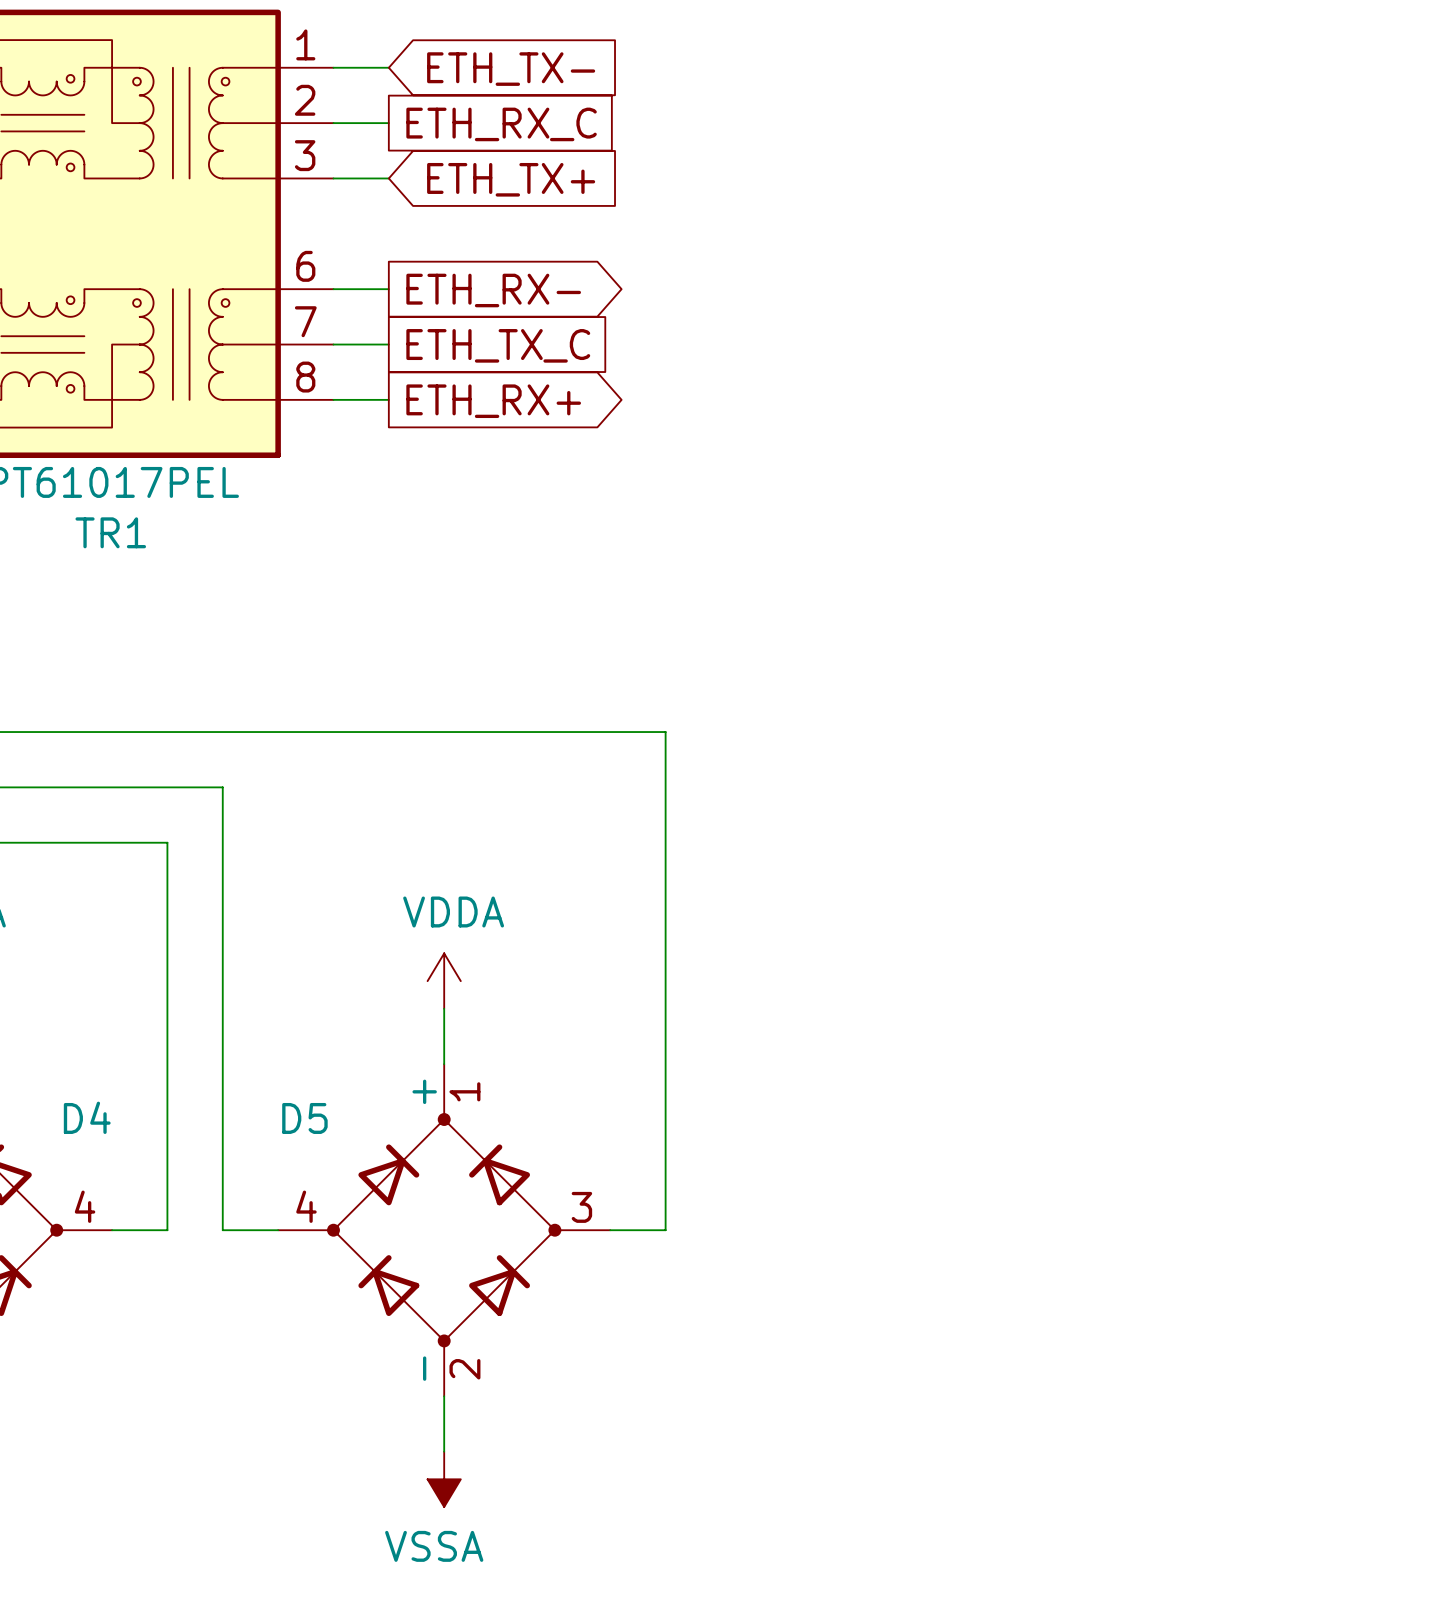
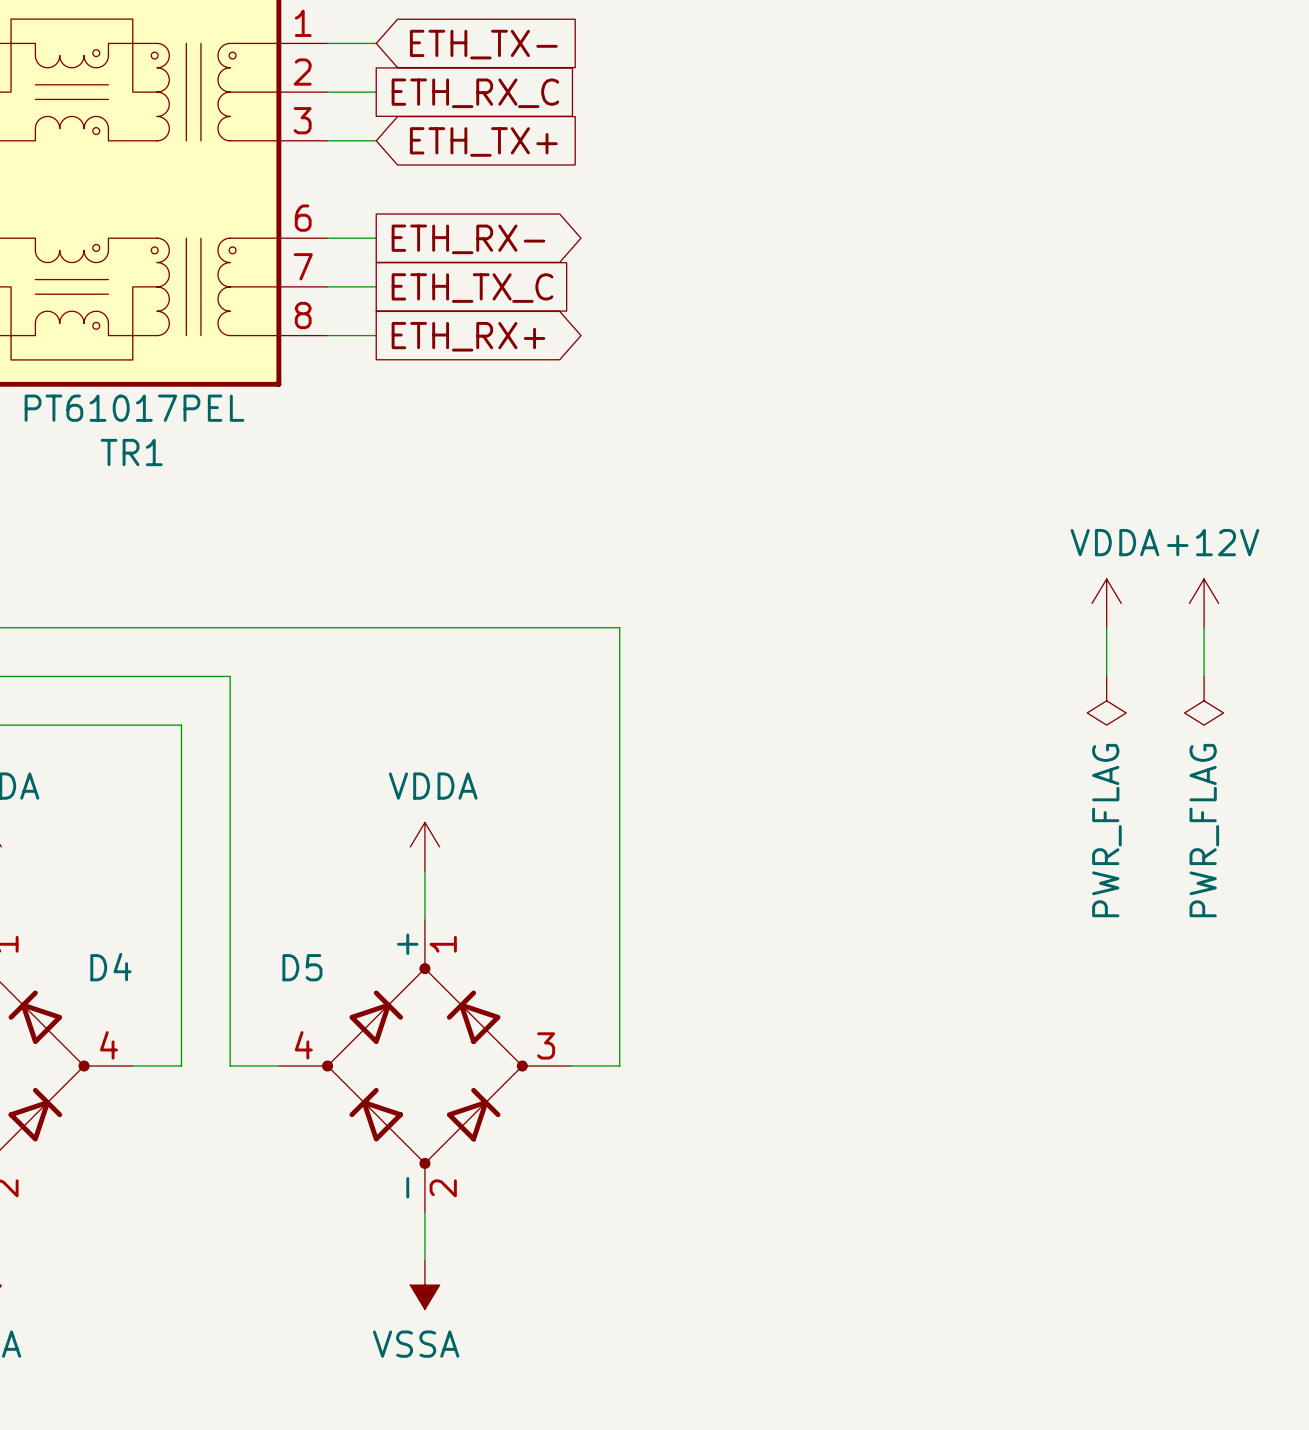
power symbol: none -> VDDA (1106, 603)
power symbol: none -> +12V (1204, 603)
wire: none -> (1106, 627) (1106, 676)
wire: none -> (1204, 627) (1204, 676)
power symbol: none -> PWR_FLAG (1106, 700)
power symbol: none -> PWR_FLAG (1204, 700)

